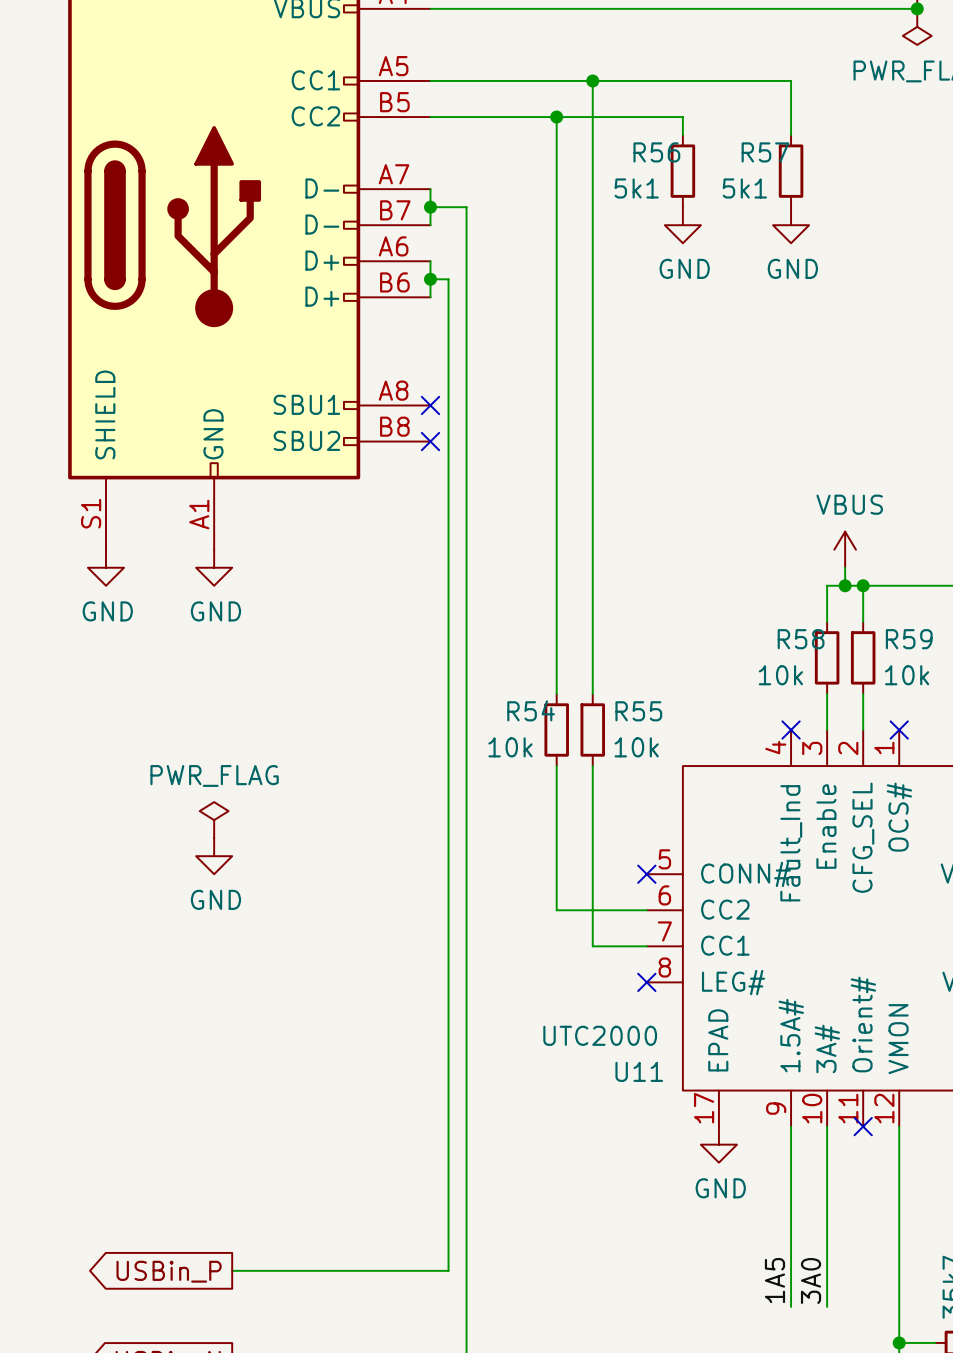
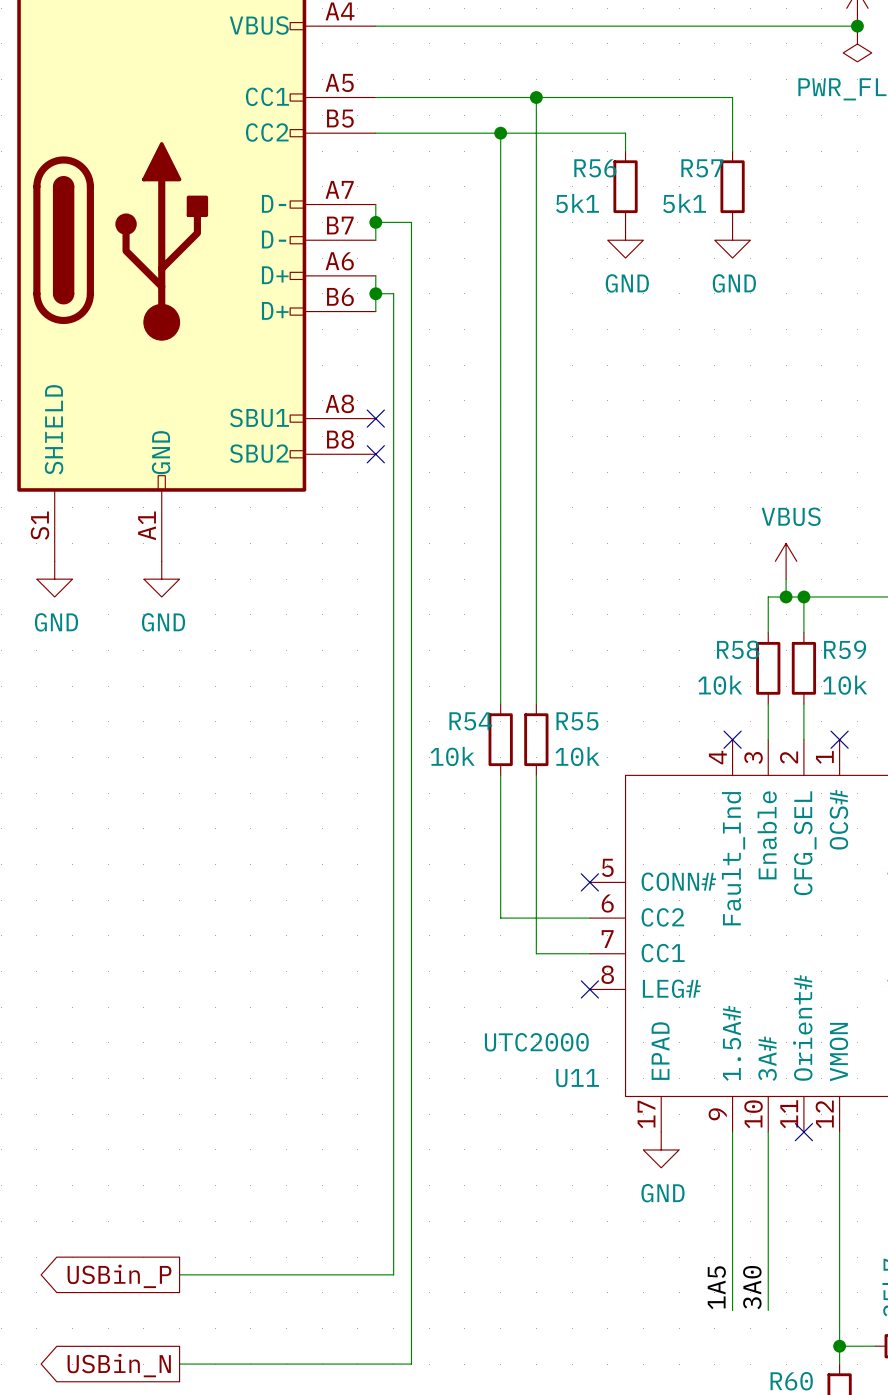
power symbol: PWR_FLAG (214, 820) -> none
power symbol: GND (214, 856) -> none

